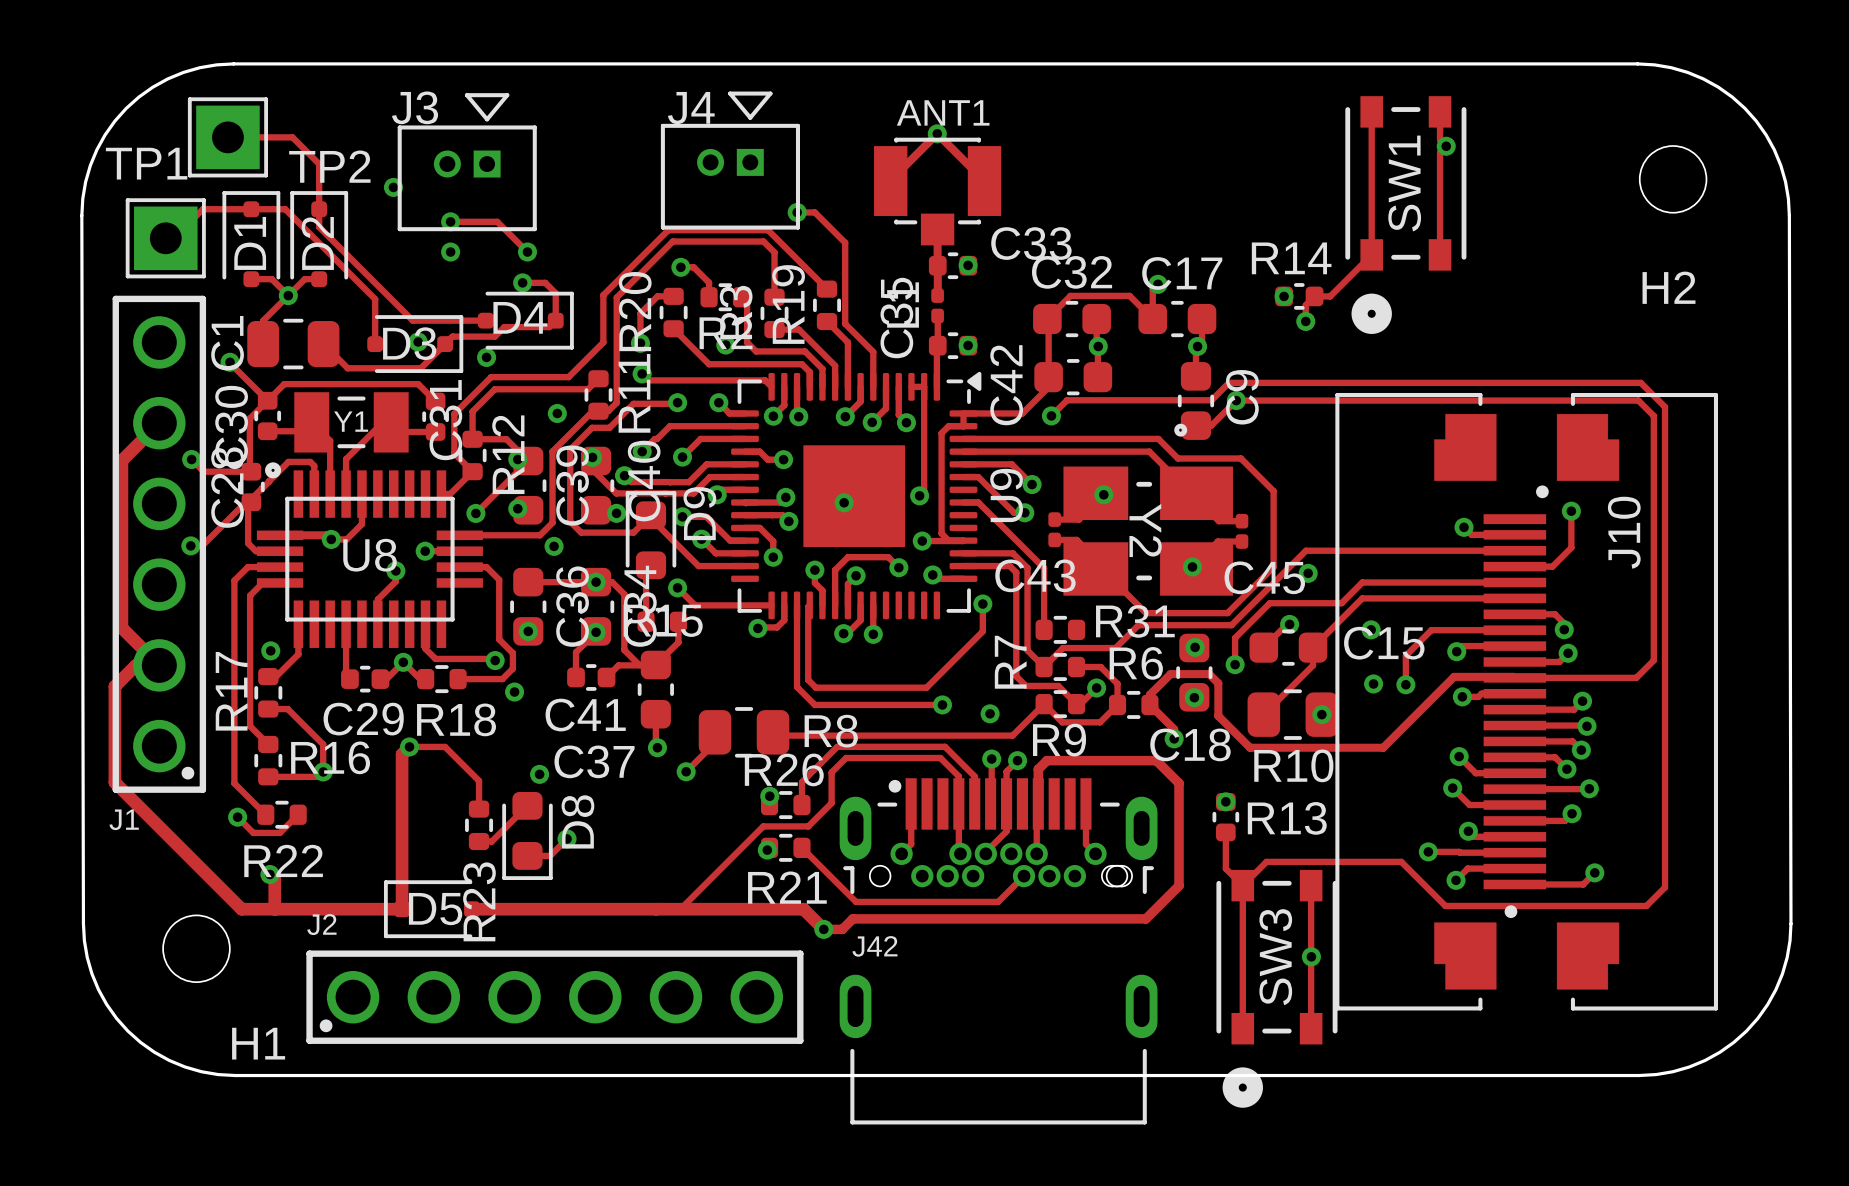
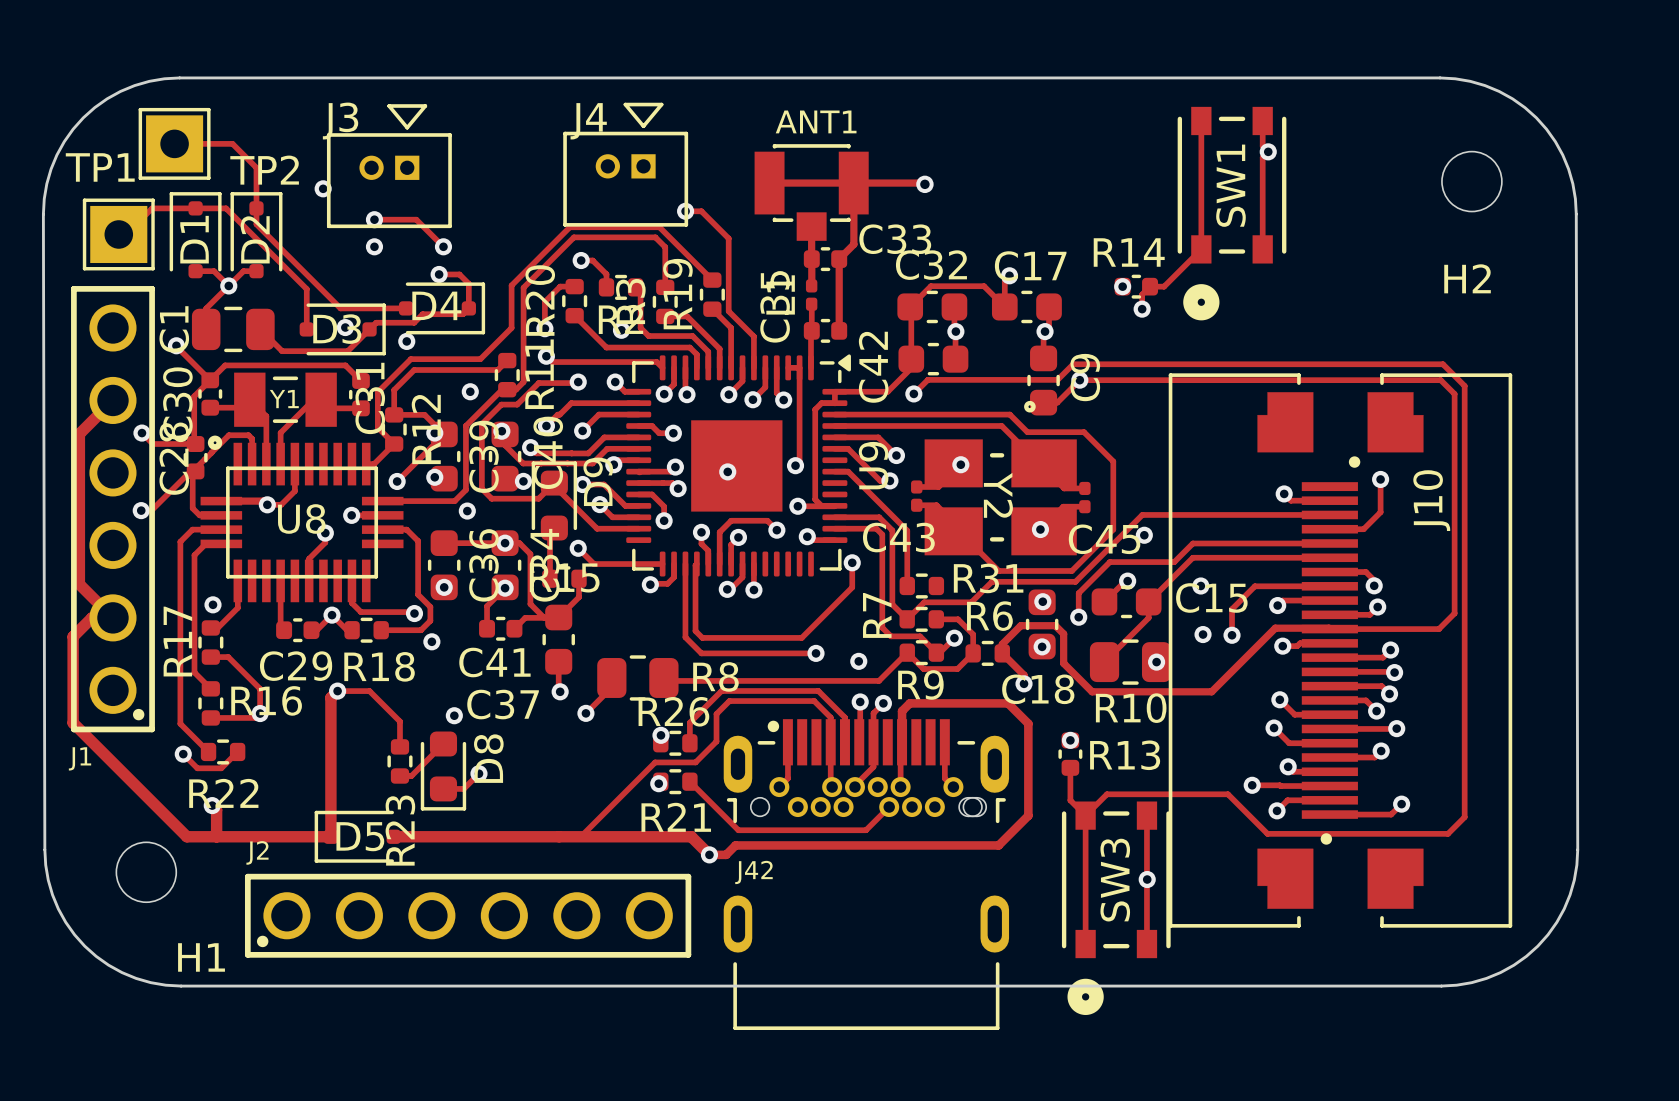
via: (937, 133) -> none
track: (890, 180) (937, 133) (984, 181) -> (769, 183) (924, 184)
track: none -> (853, 183) (853, 244) (839, 259) (839, 330)
via: none -> (924, 184)
via: (968, 265) -> none
via: (968, 345) -> none

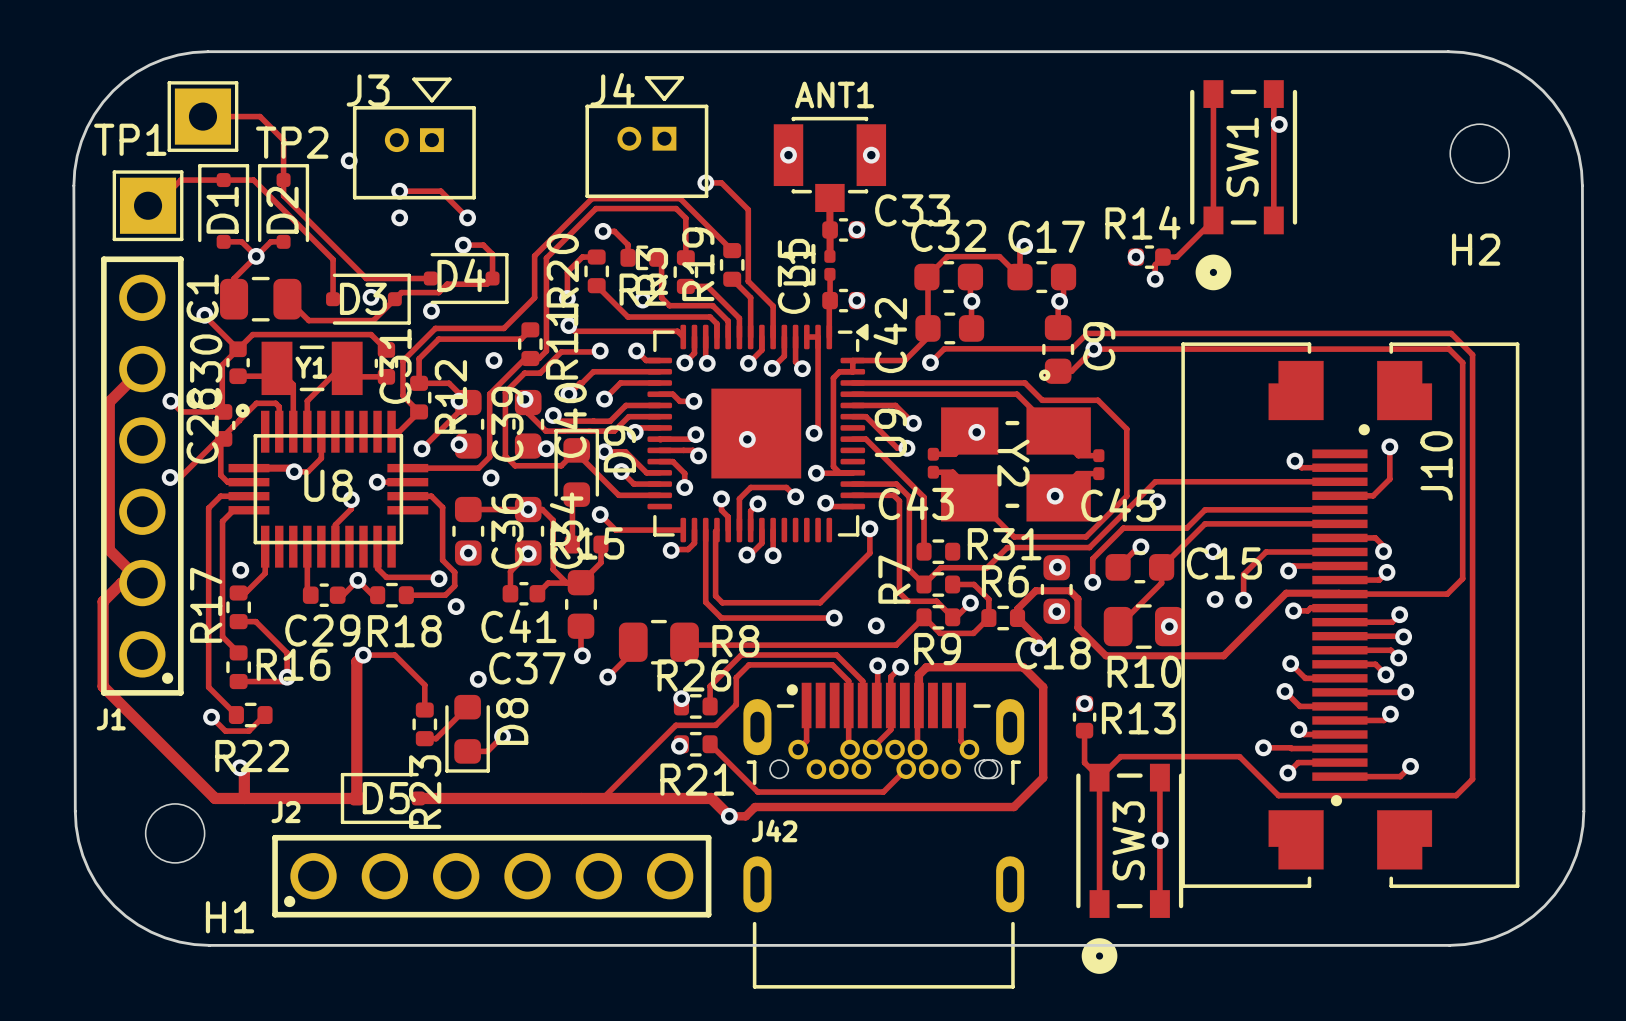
track: (769, 183) (924, 184) -> none
via: none -> (788, 155)
track: (853, 183) (853, 244) (839, 259) (839, 330) -> none
via: none -> (871, 155)
via: (924, 184) -> none
via: none -> (856, 229)
via: none -> (856, 300)

